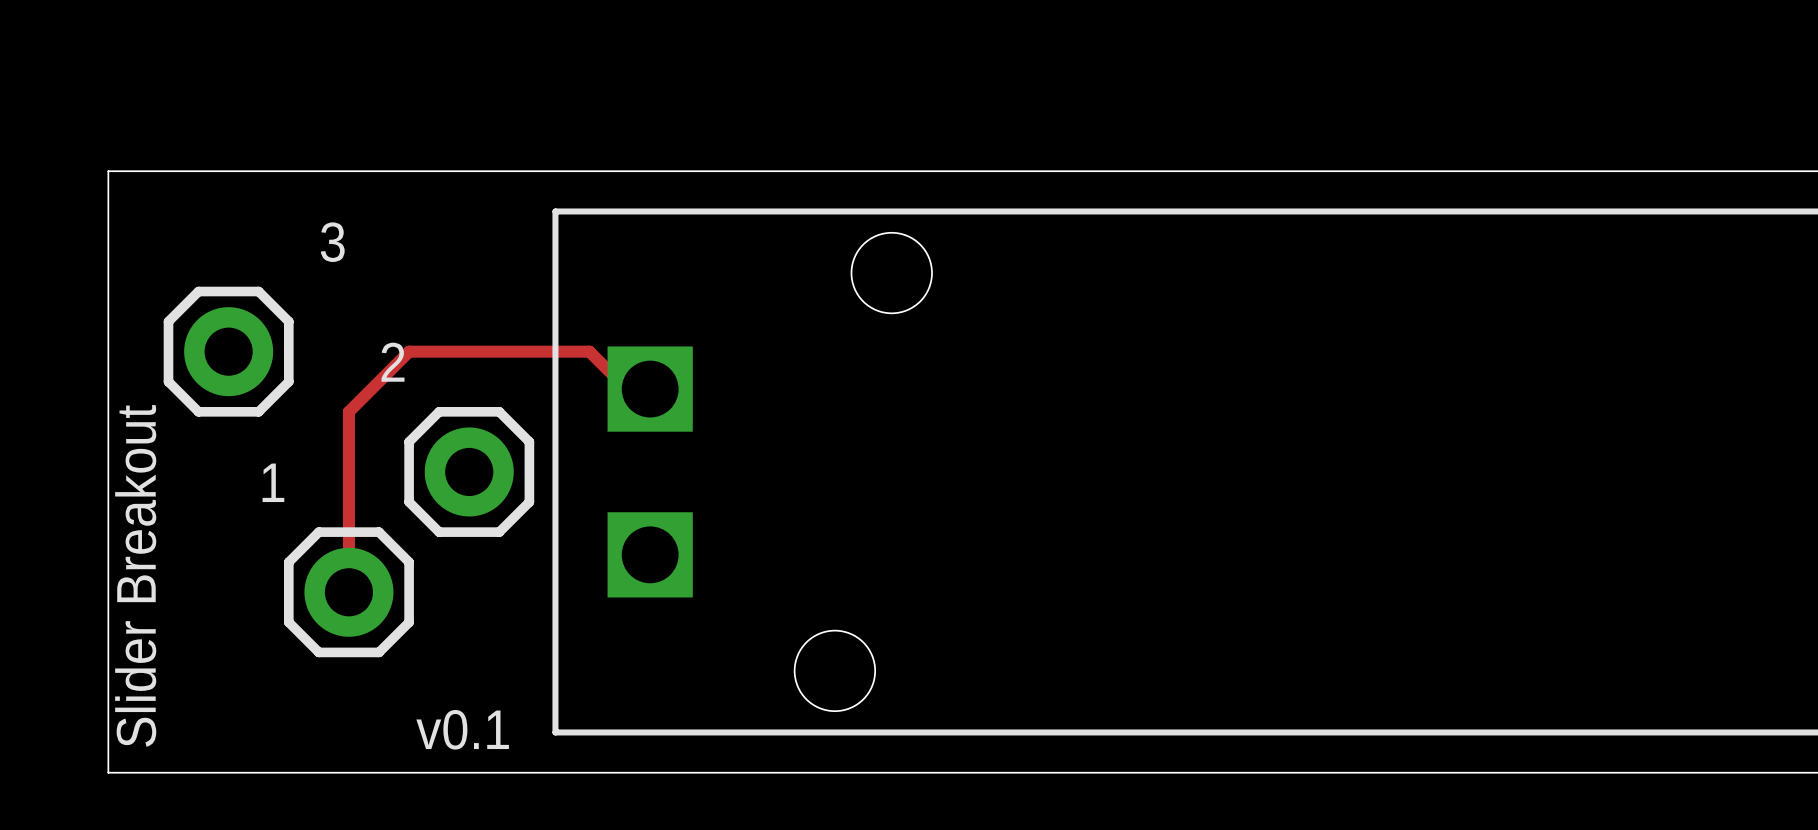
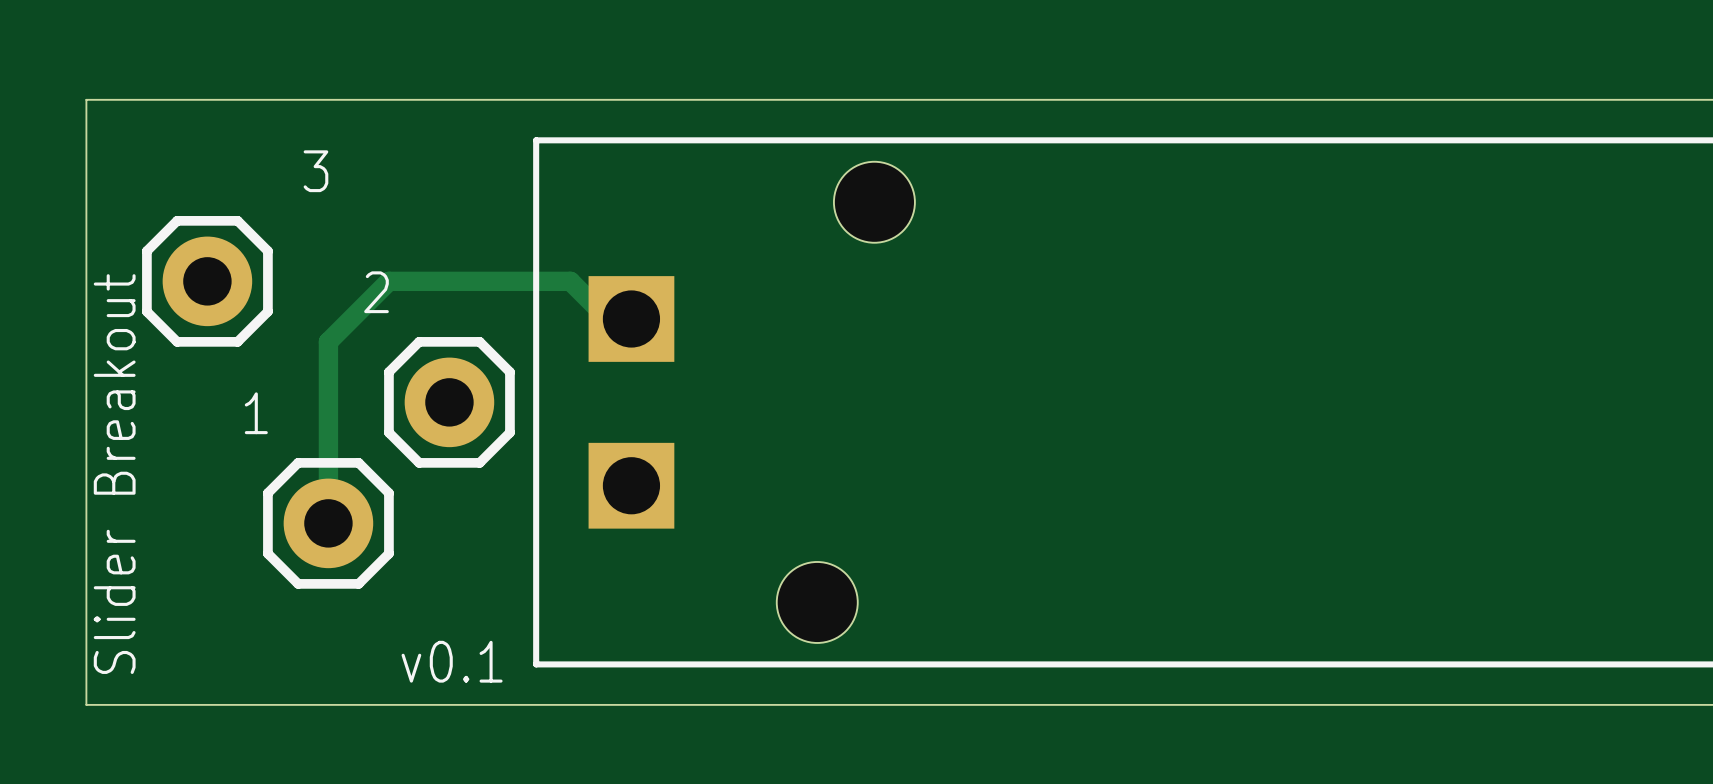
track width: thin (650, 389) (626, 389) (589, 351) (409, 351) (348, 411) (348, 592) -> thick (631, 318) (608, 318) (570, 281) (388, 281) (328, 341) (328, 523)

